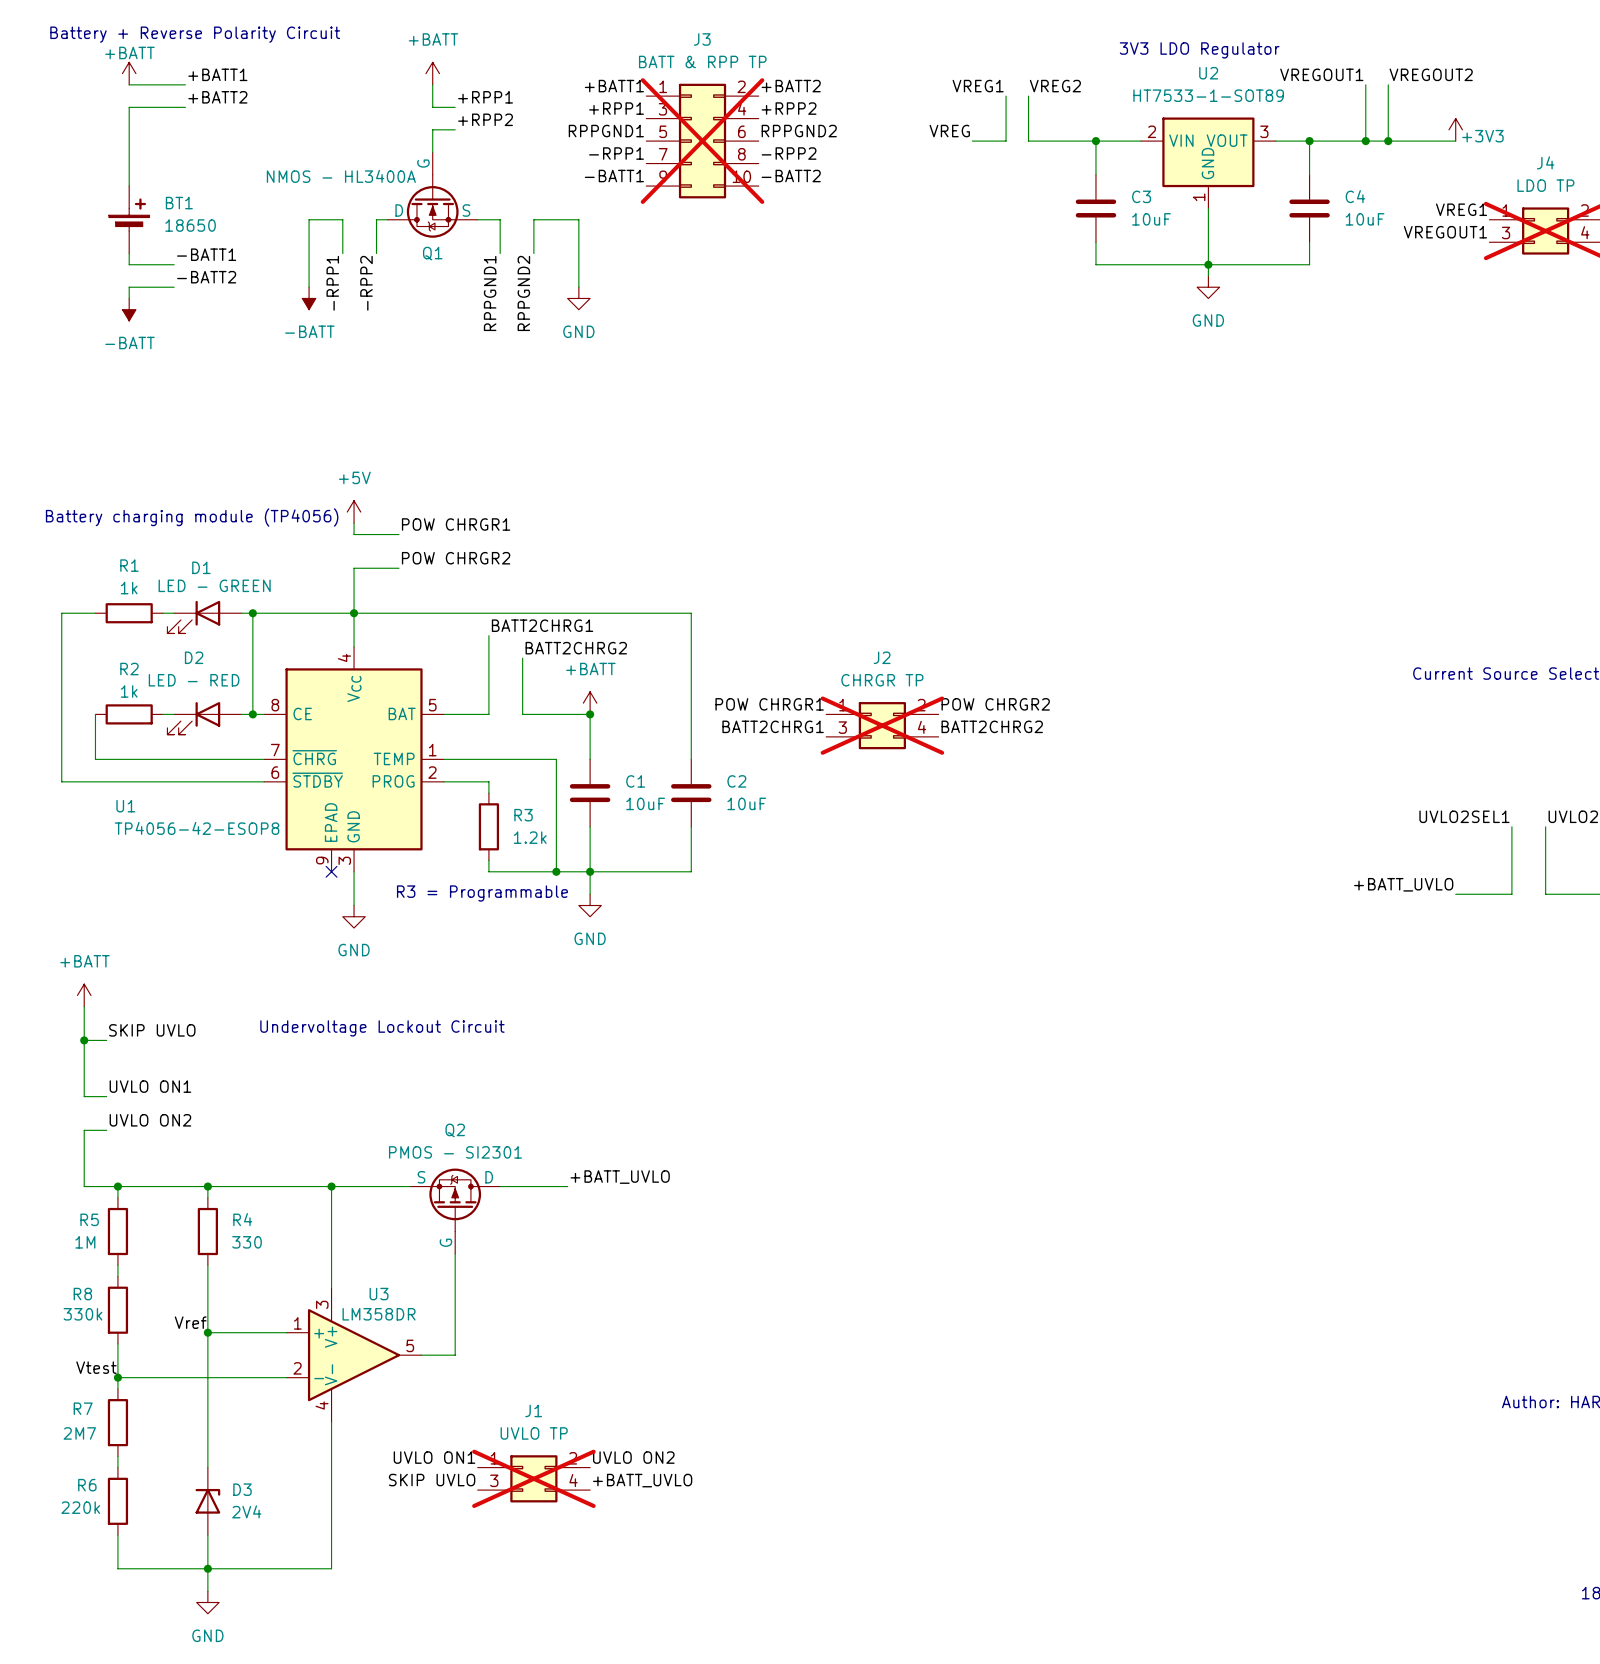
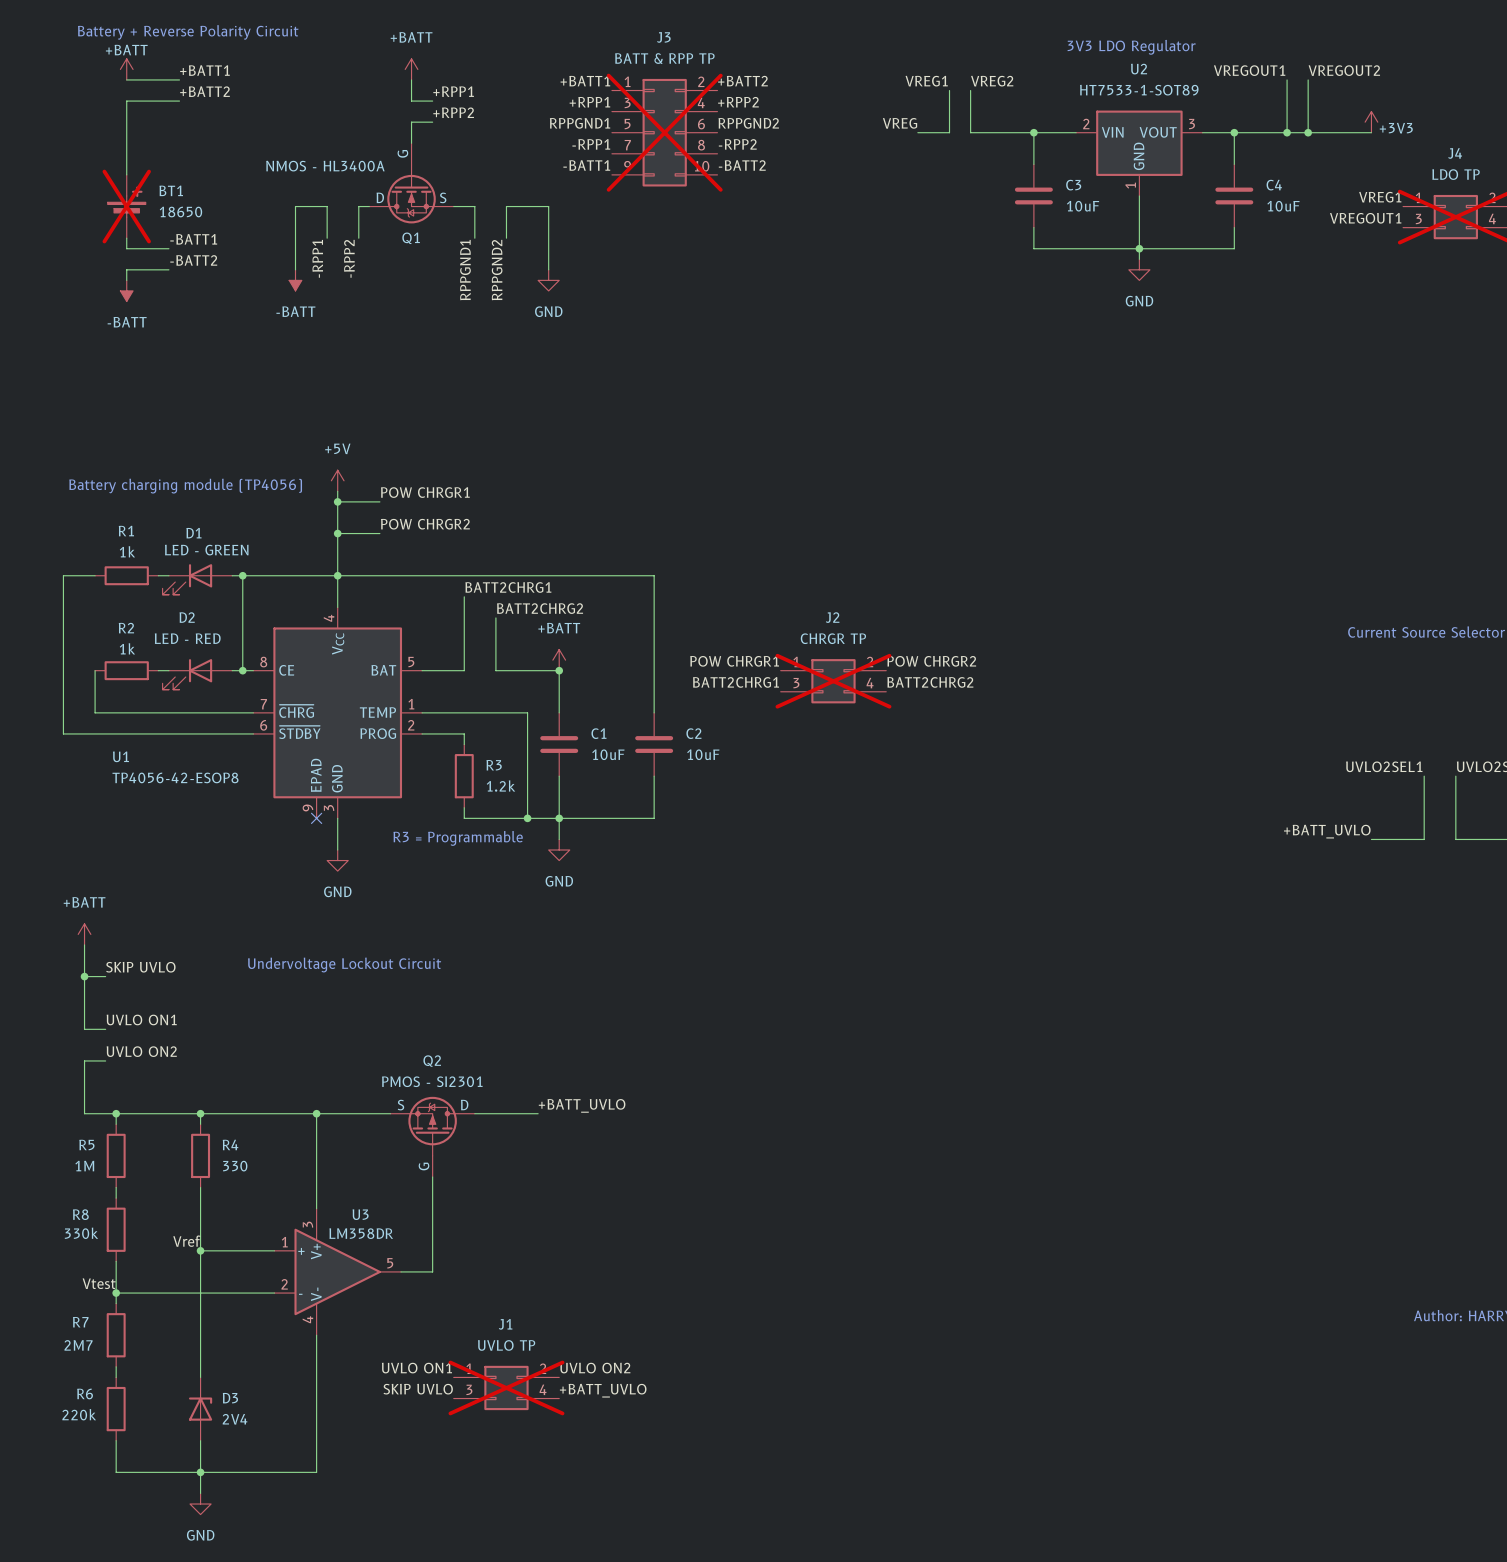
BT1 do-not-place cross: none -> (126, 206)
wire: none -> (337, 501) (337, 533)
junction: none -> (337, 501)
junction: none -> (337, 533)

